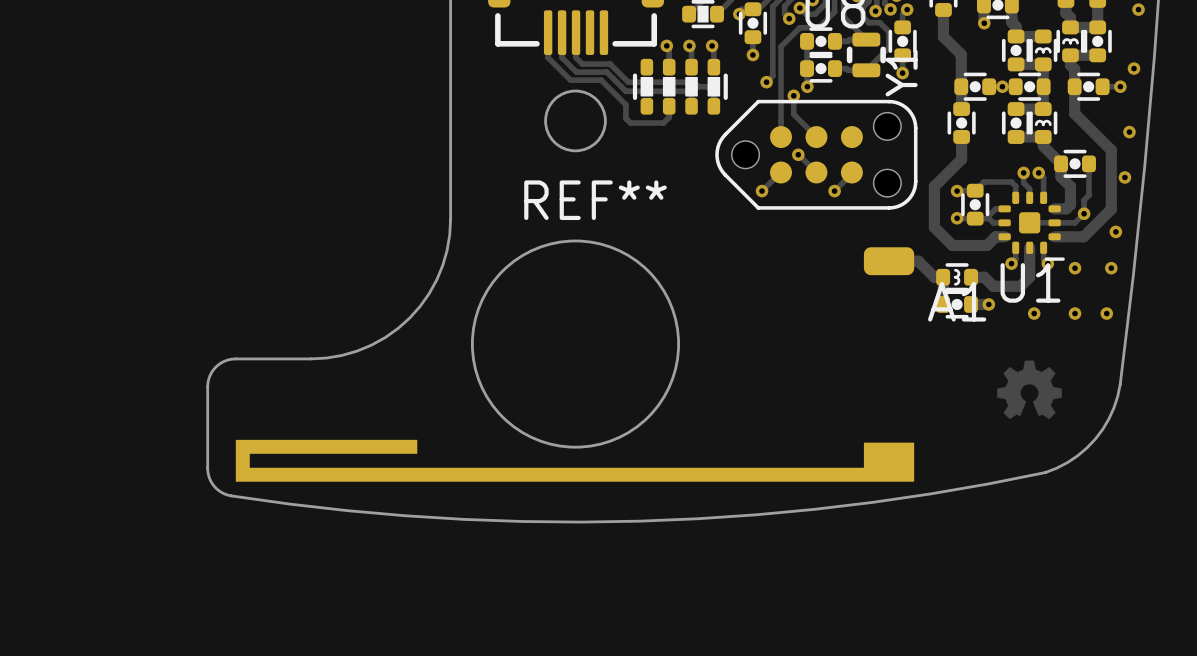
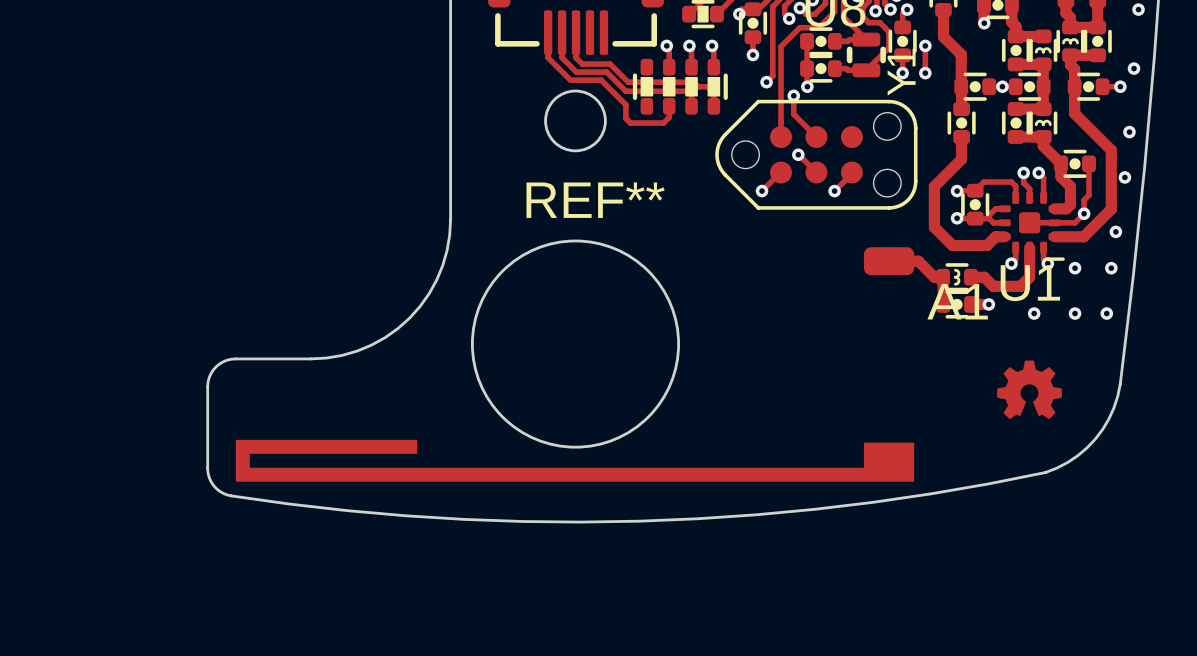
track: none -> (925, 45) (925, 73)
via: none -> (925, 45)
via: none -> (925, 73)

